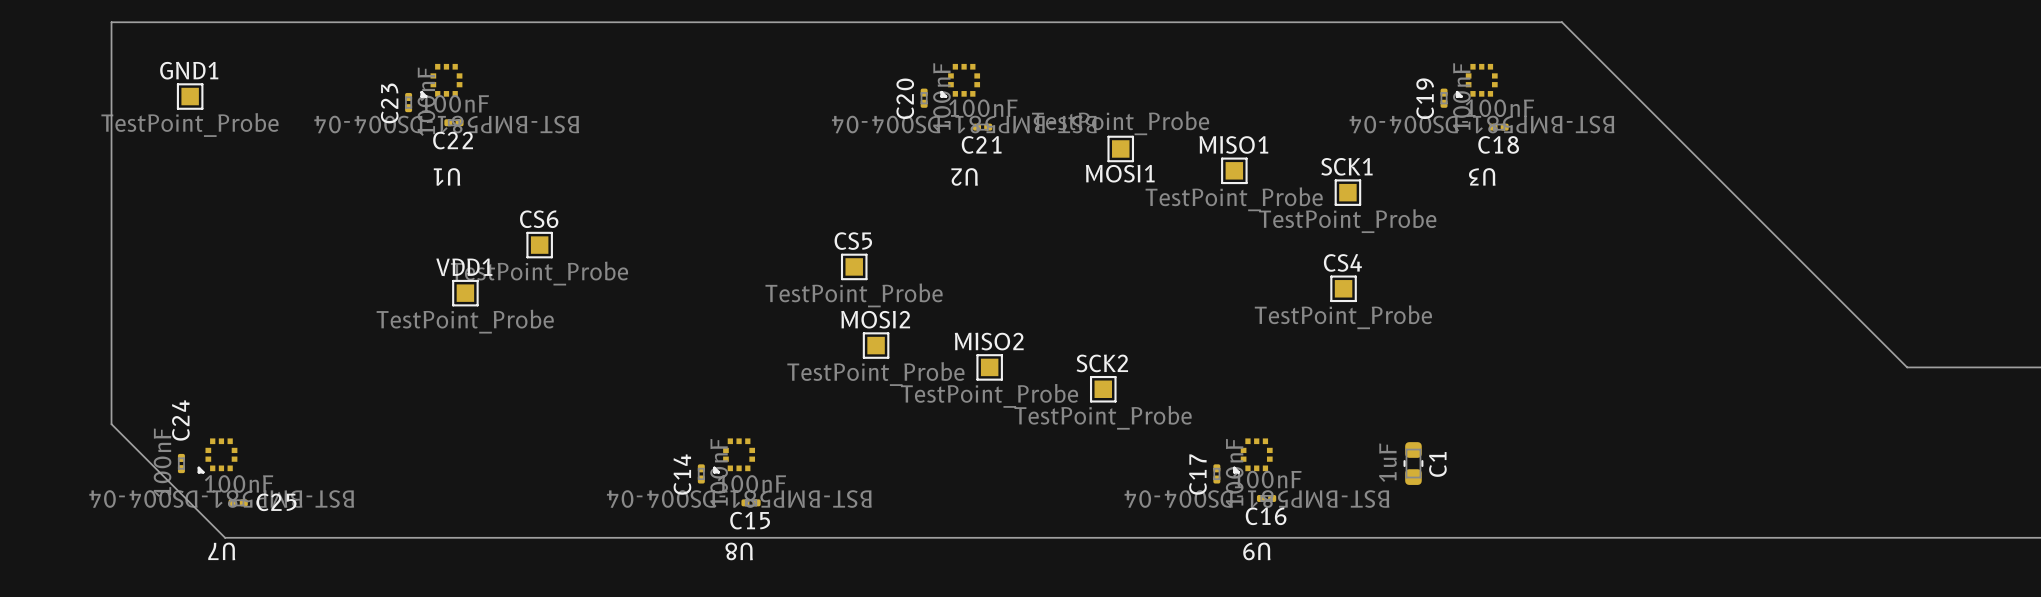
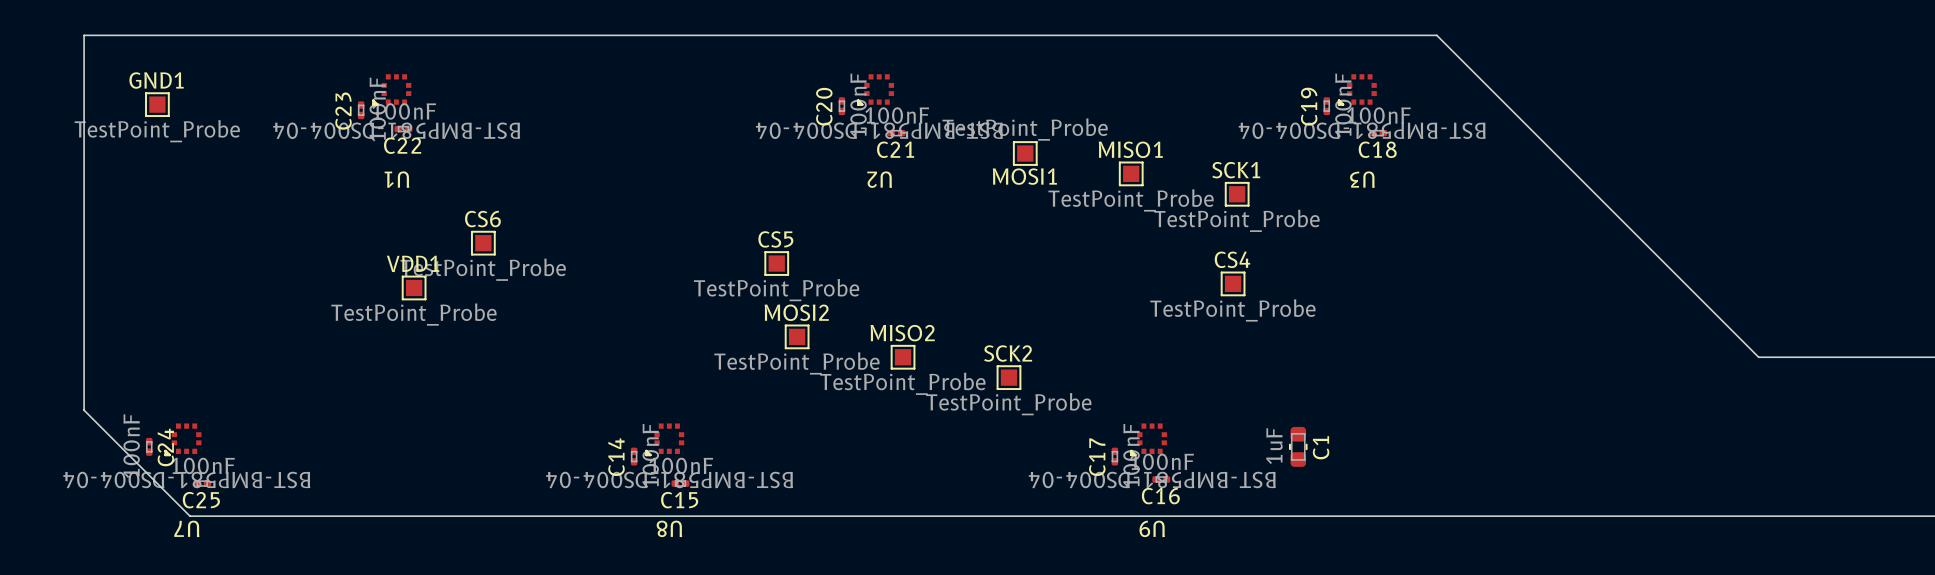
C24 name position: C24 (180, 420) -> C24 (165, 447)
C25 name position: C25 (276, 502) -> C25 (201, 500)

